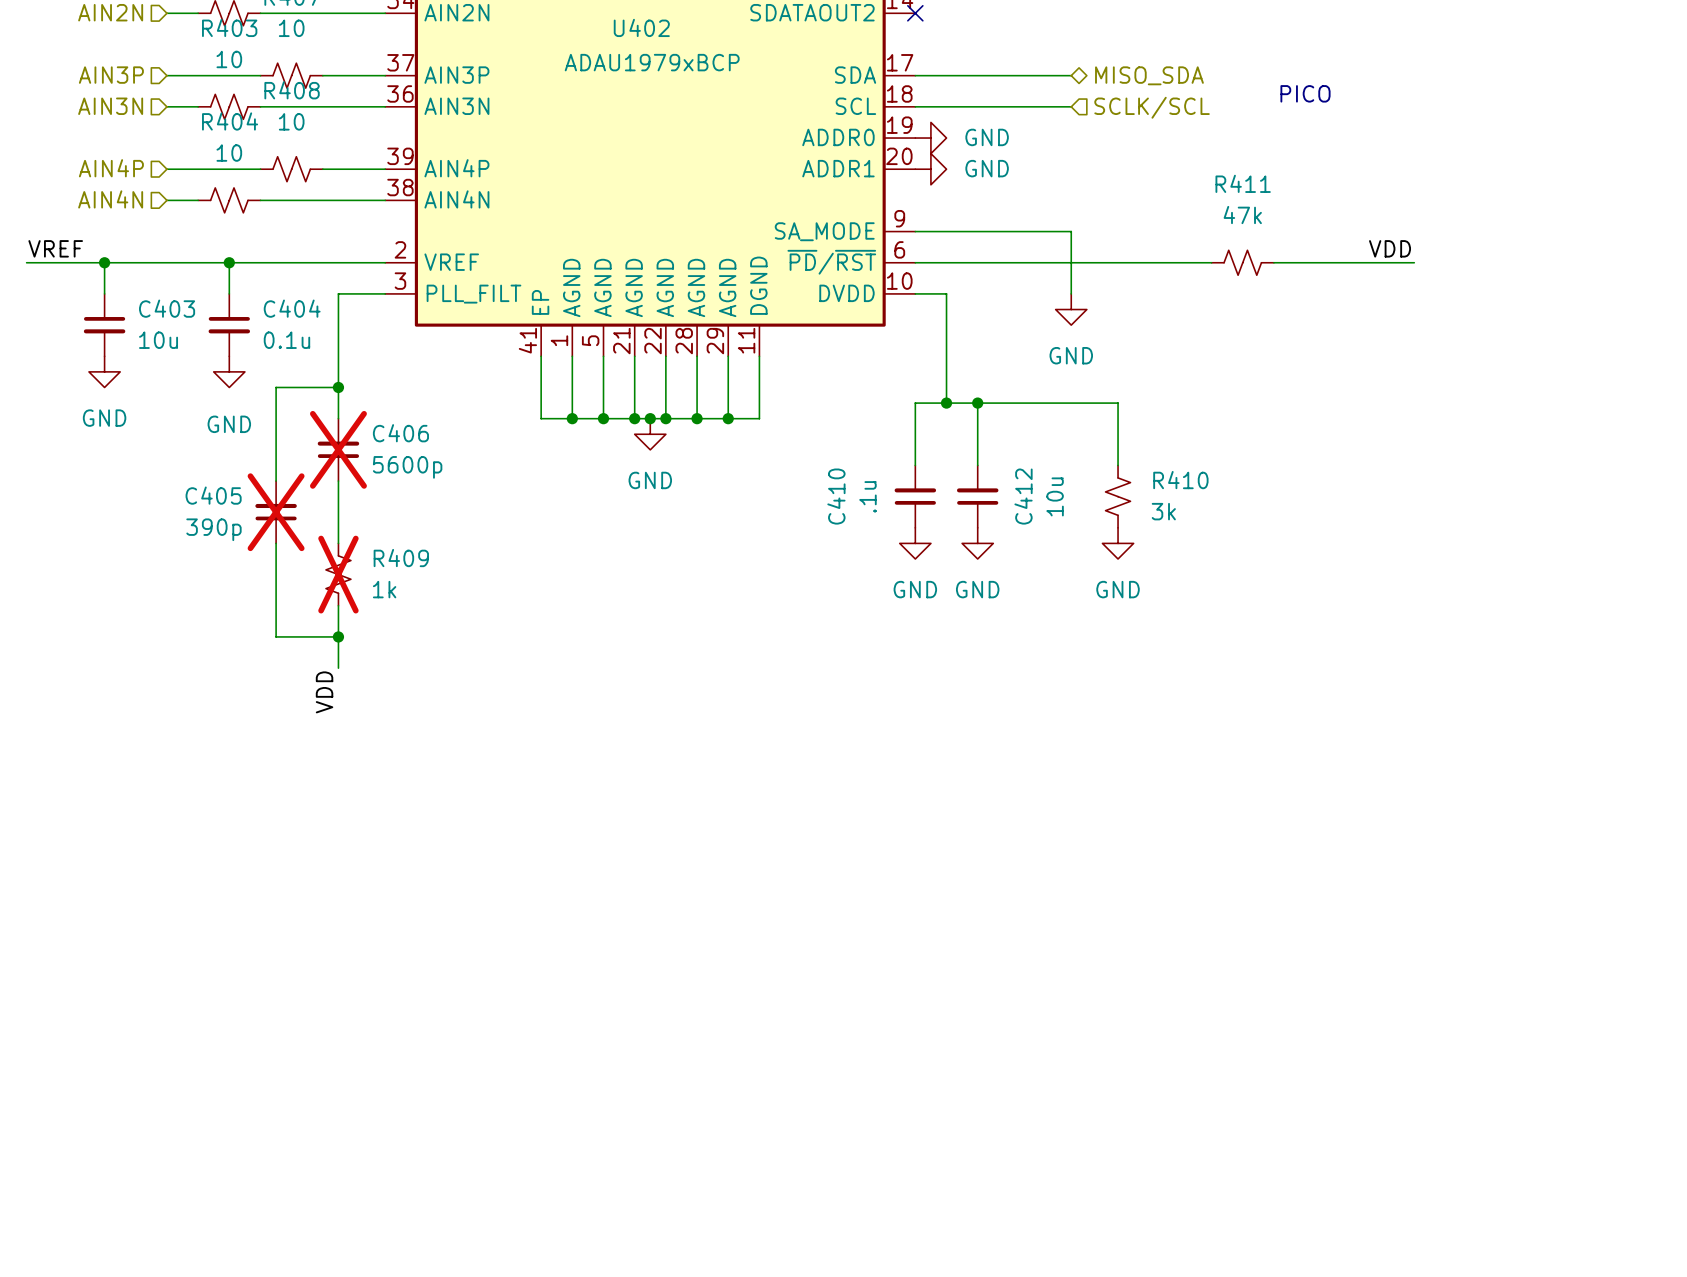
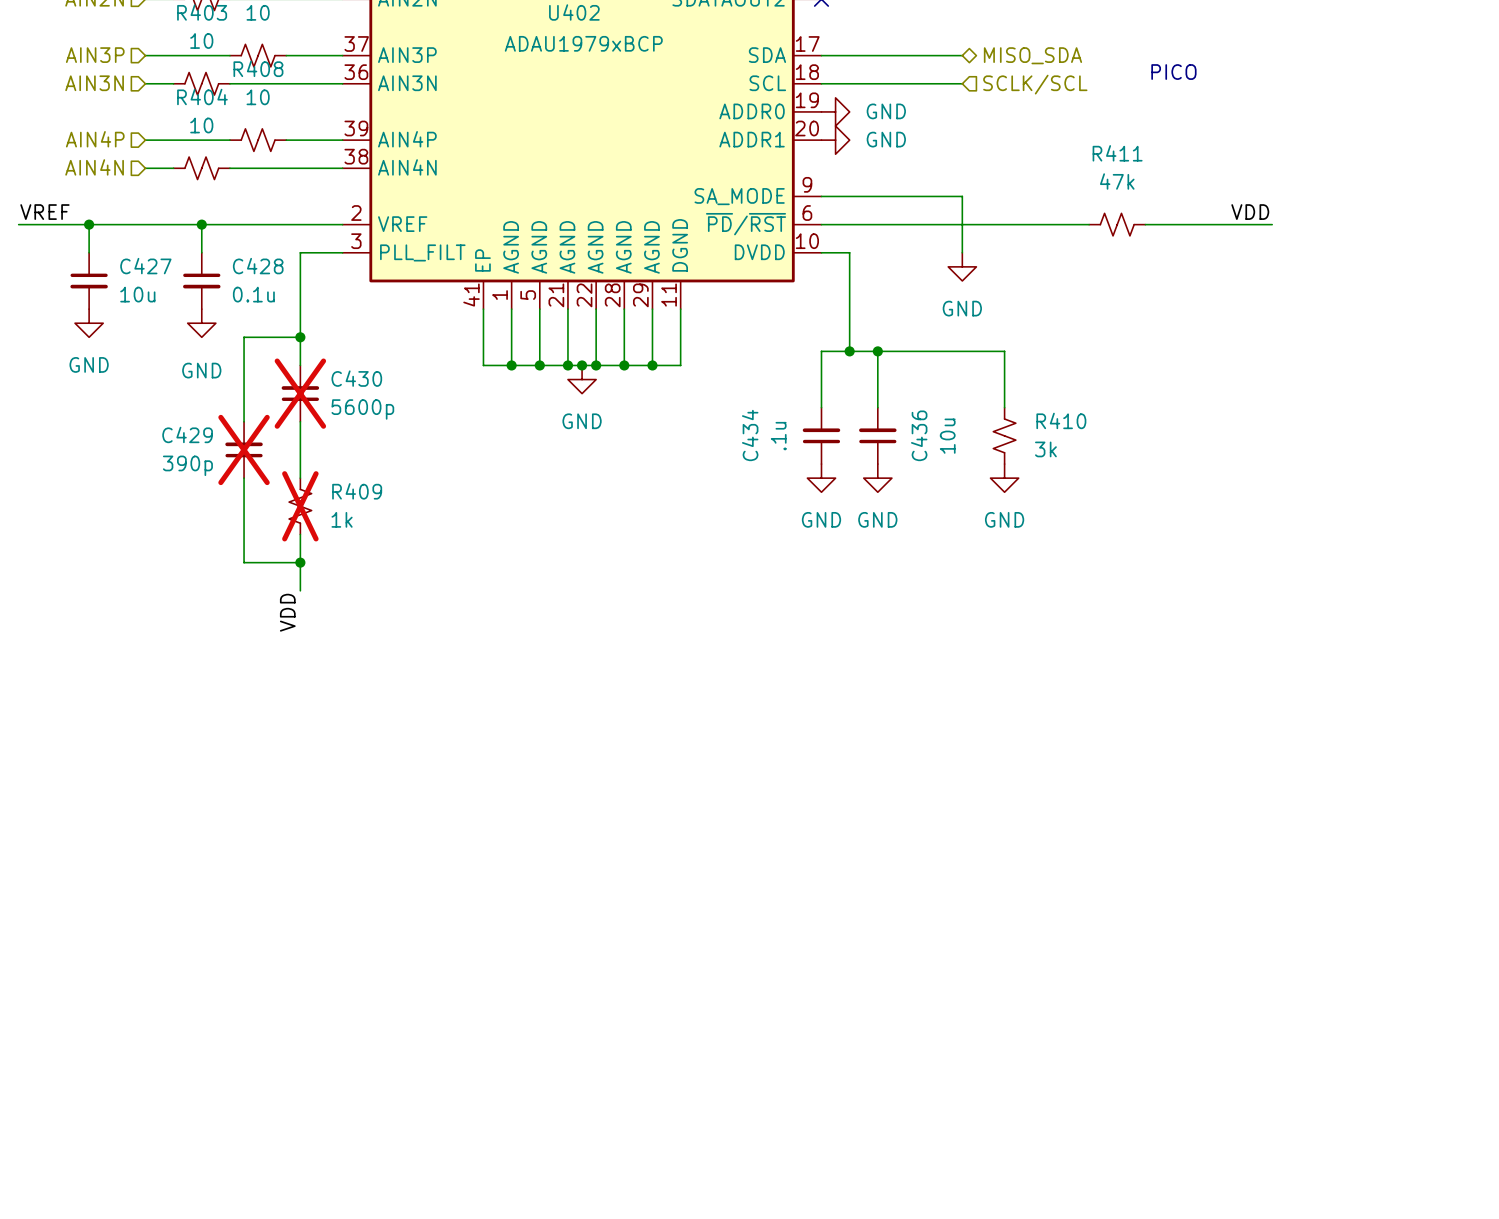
C403 name: C403 (167, 308) -> C427 (145, 266)
C404 name: C404 (292, 308) -> C428 (258, 266)
C406 name: C406 (400, 433) -> C430 (356, 378)
C405 name: C405 (213, 495) -> C429 (187, 434)
C410 name: C410 (836, 496) -> C434 (750, 435)
C412 name: C412 (1023, 496) -> C436 (919, 435)

